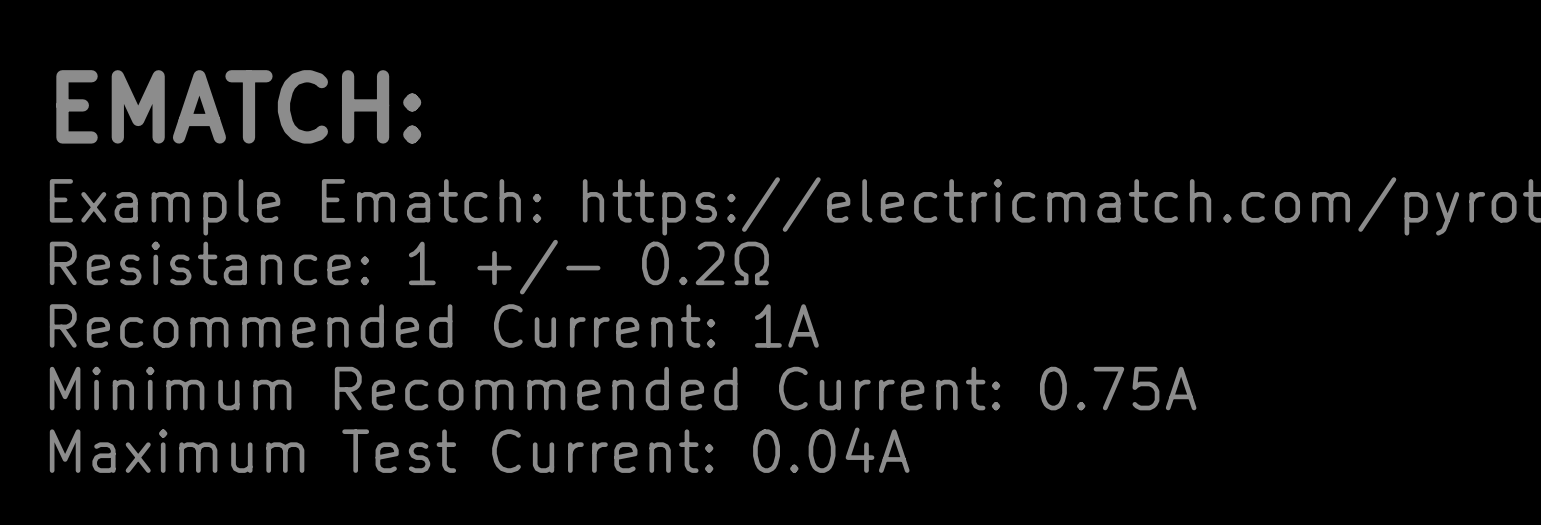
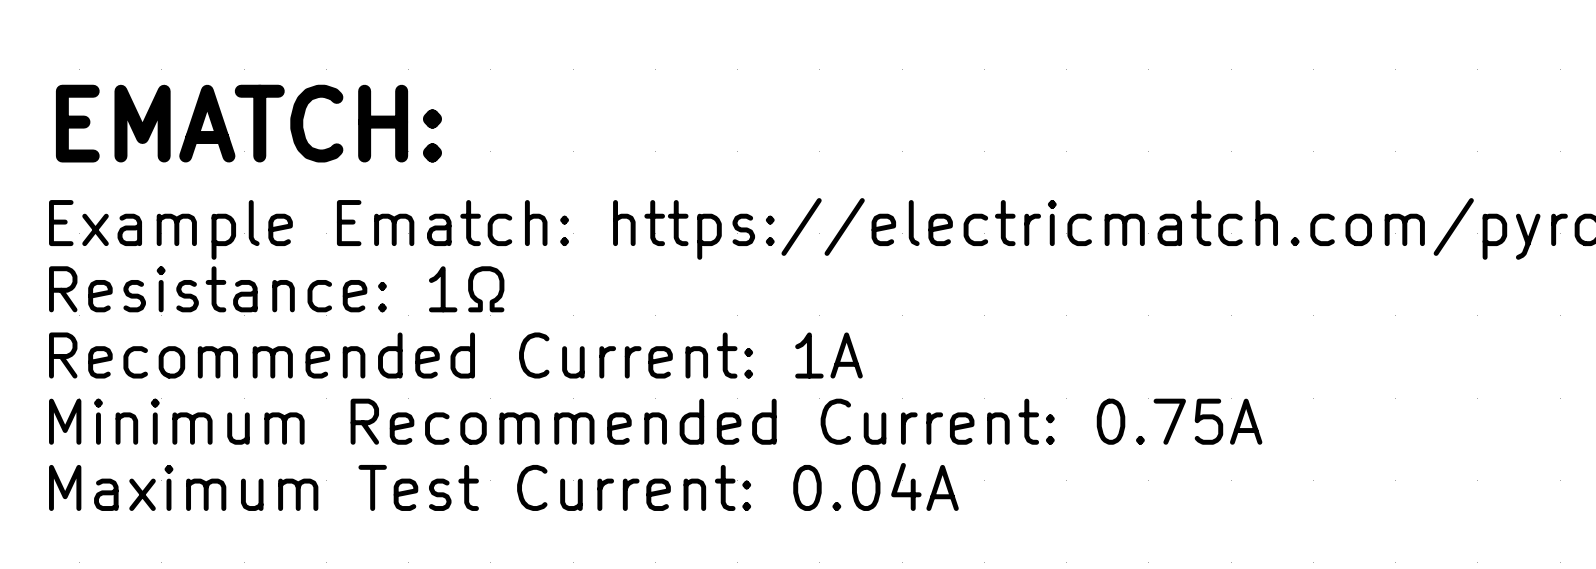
text: Resistance: 1 +/- 0.2Ω (409, 267) -> Resistance: 1Ω (276, 289)

